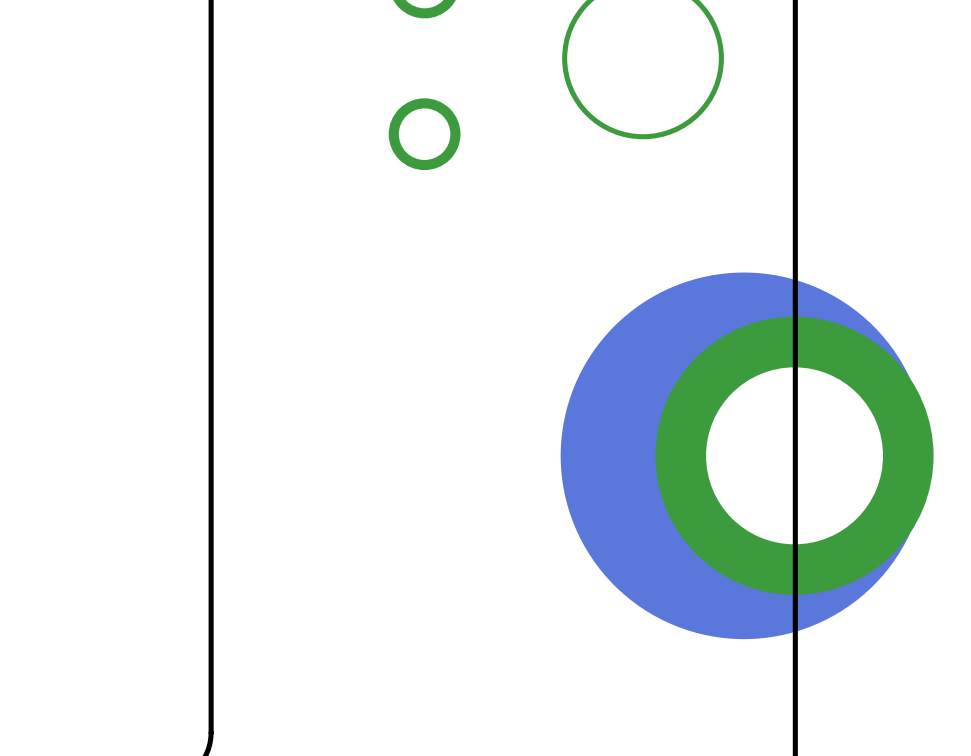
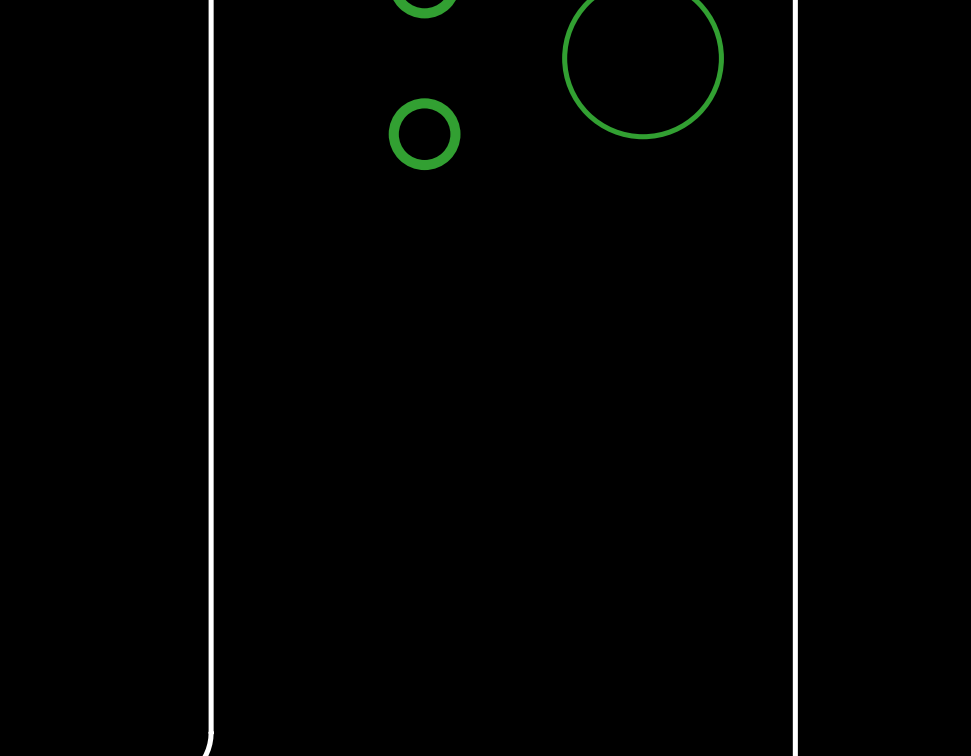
part: (747, 455) -> none

